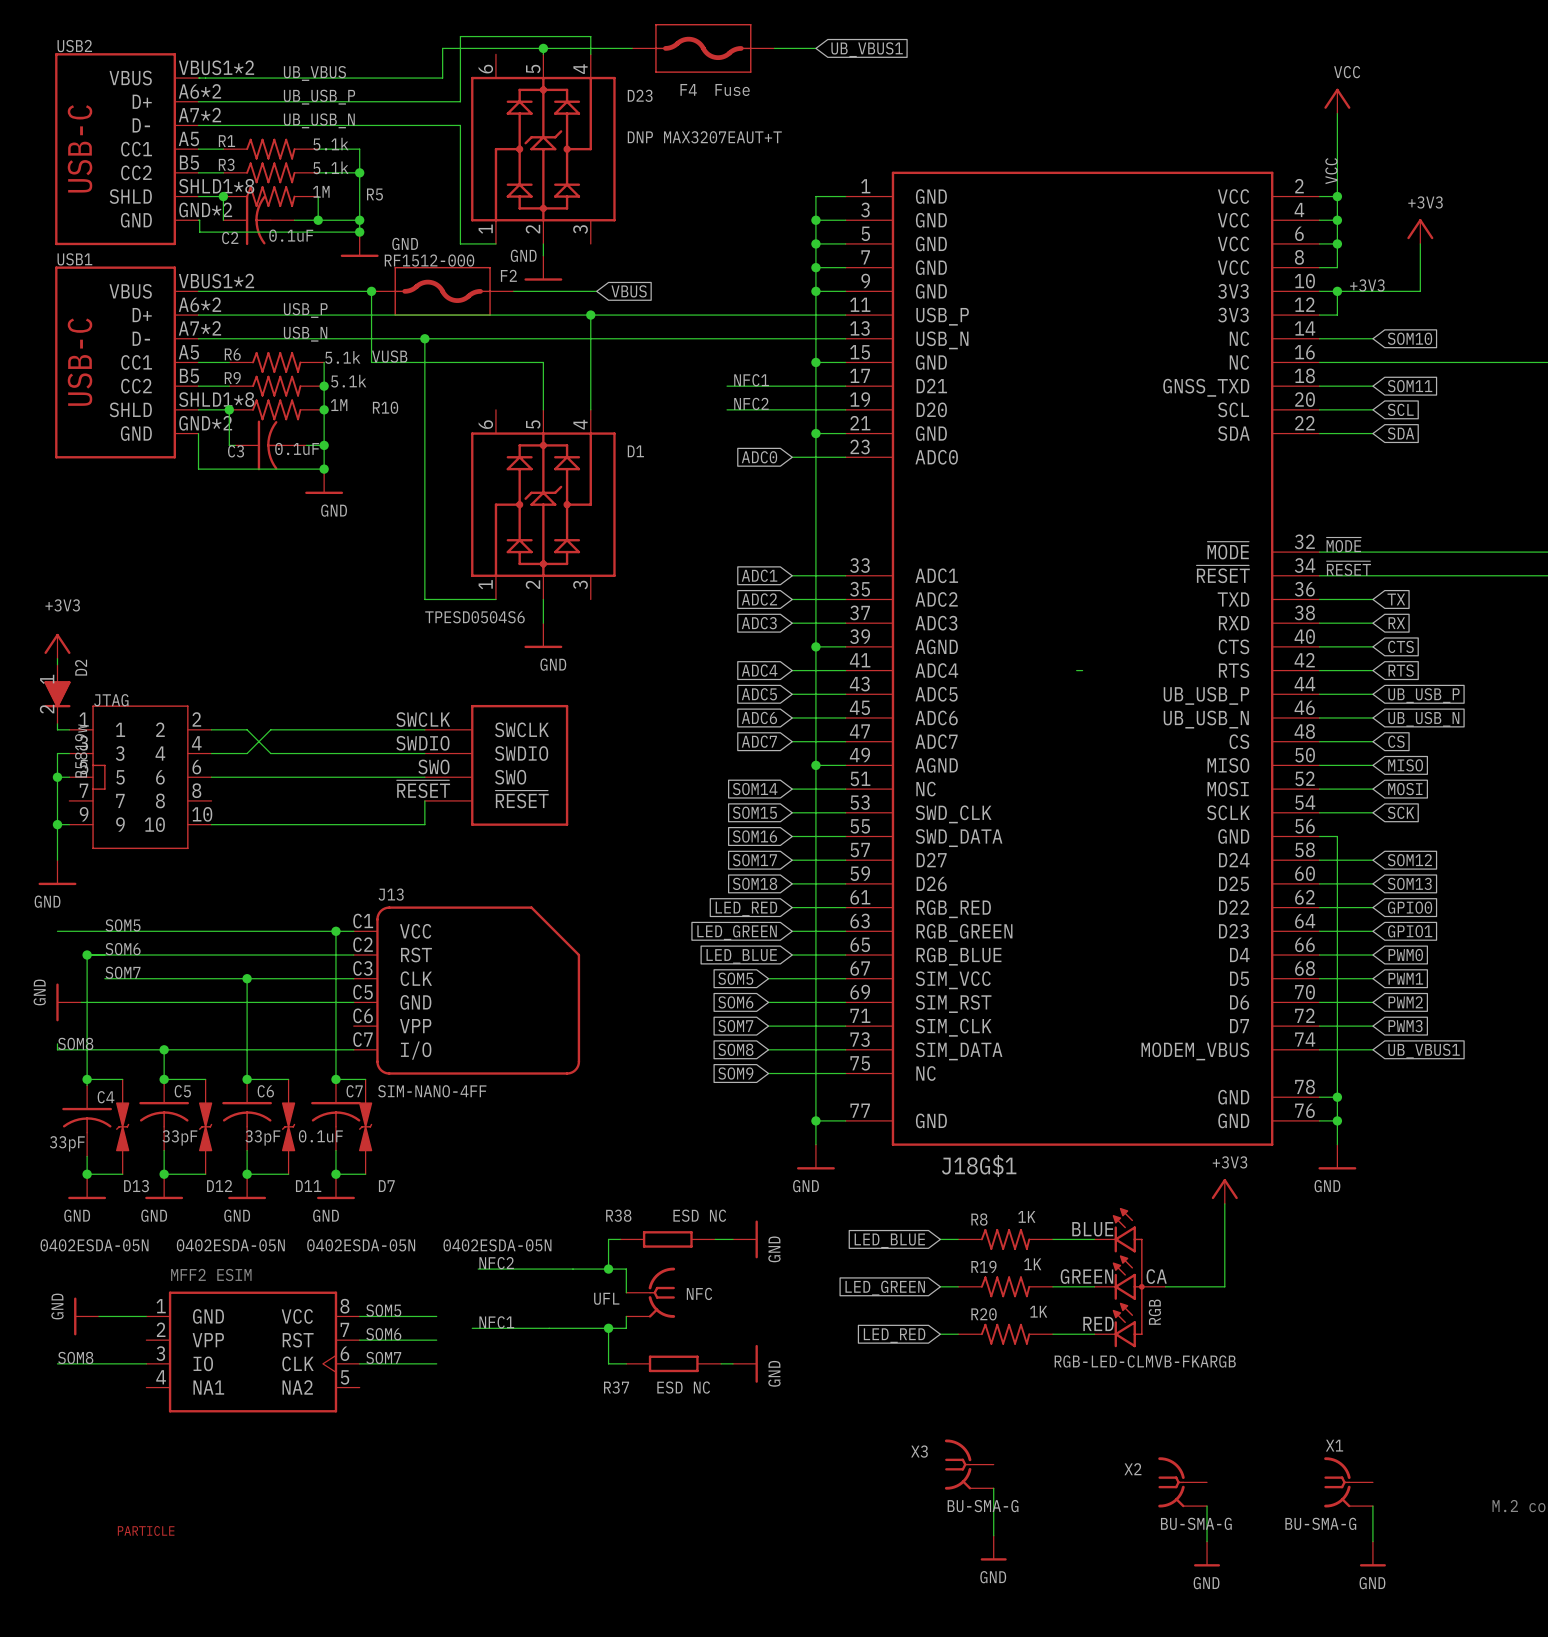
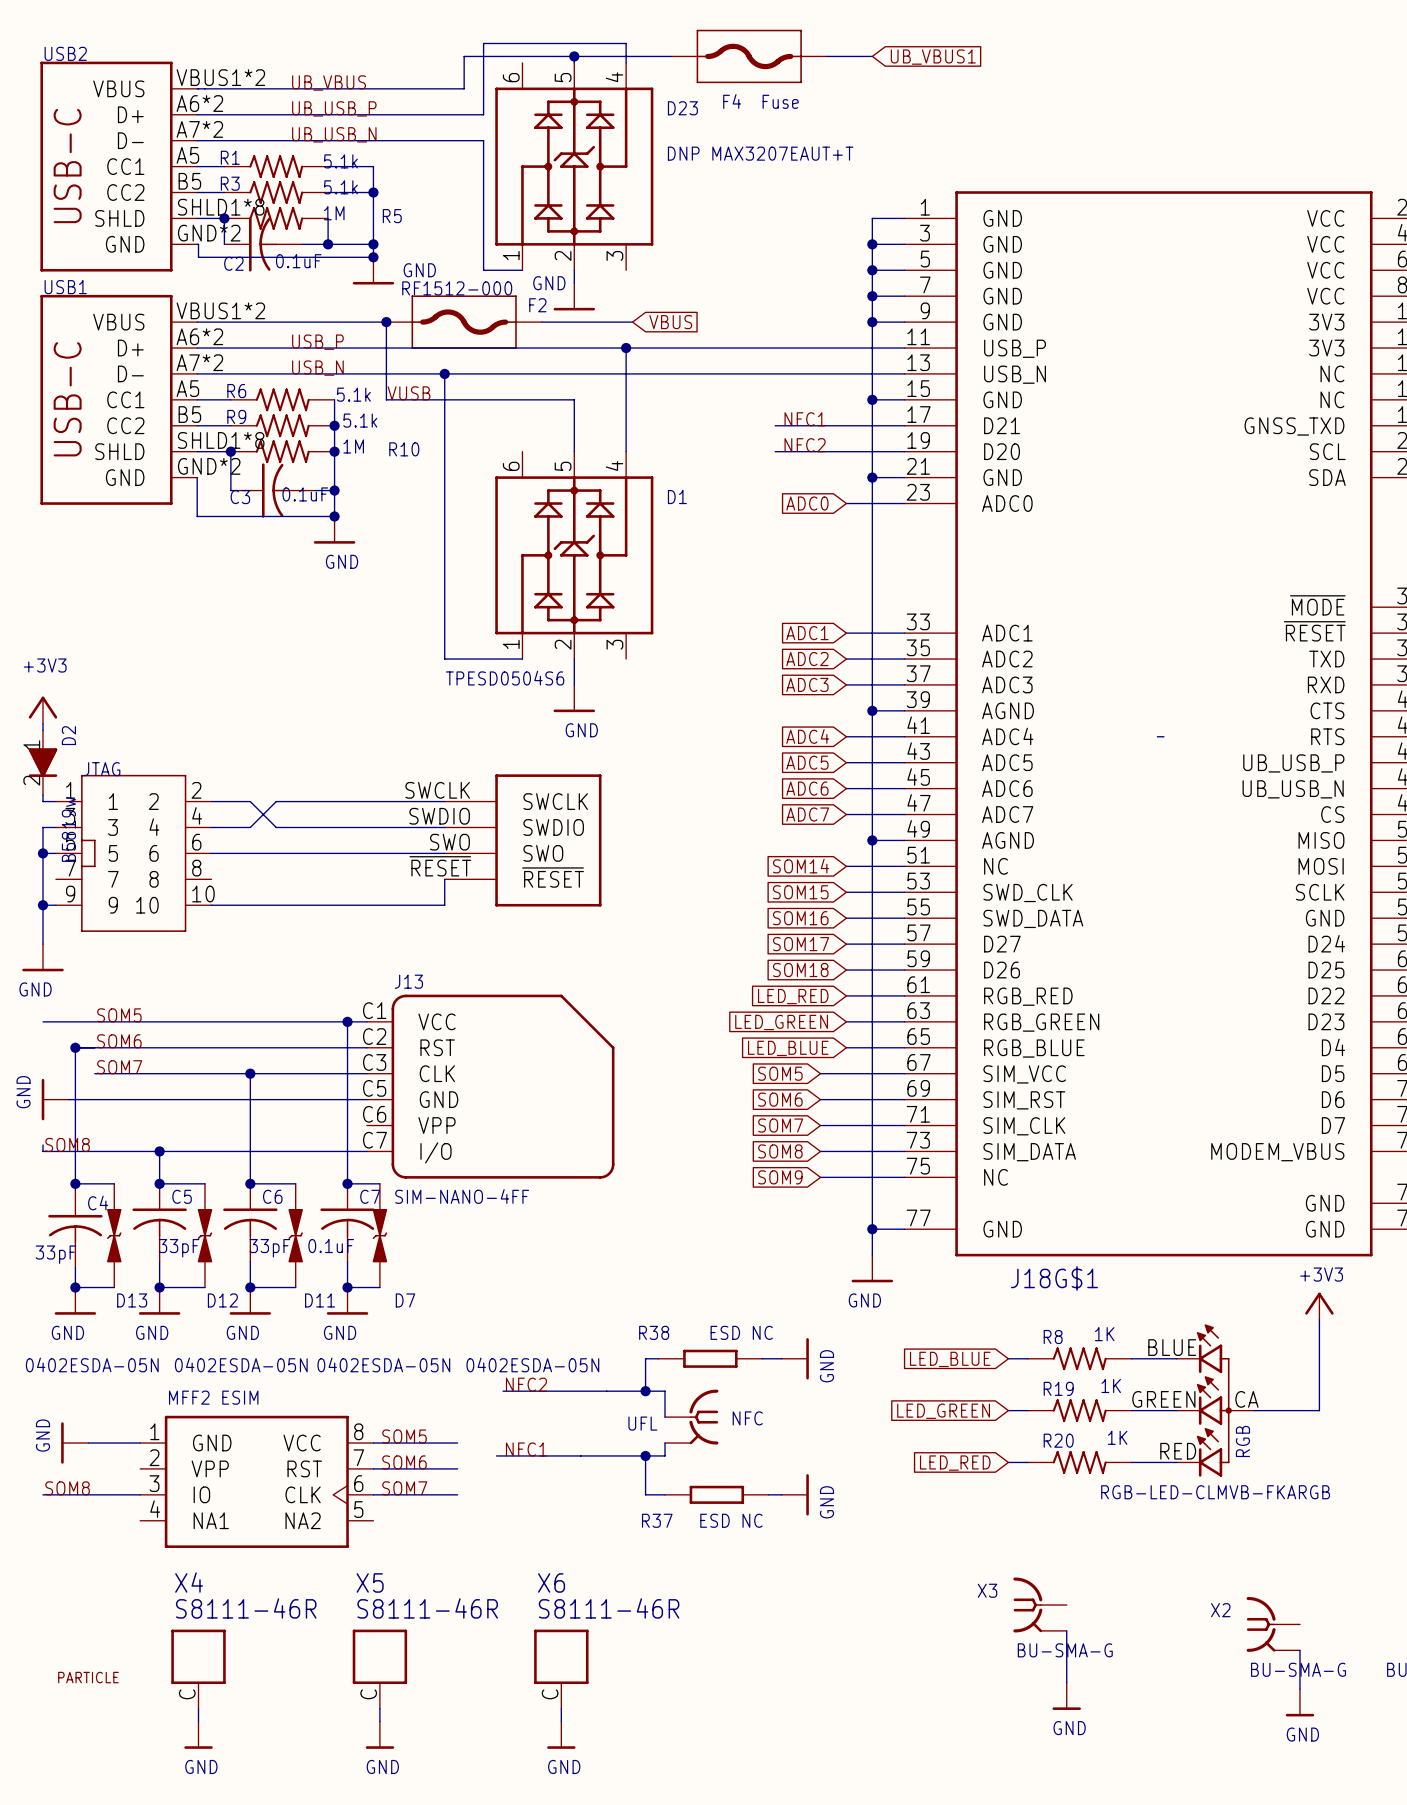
X4: none -> S8111-46R (198, 1669)
X5: none -> S8111-46R (379, 1669)
X6: none -> S8111-46R (561, 1669)
part position: (146, 1530) -> (88, 1677)
wire: none -> (198, 1708) (198, 1721)
wire: none -> (379, 1708) (379, 1721)
wire: none -> (561, 1708) (561, 1721)
power symbol: none -> GND (198, 1735)
power symbol: none -> GND (379, 1735)
power symbol: none -> GND (561, 1735)

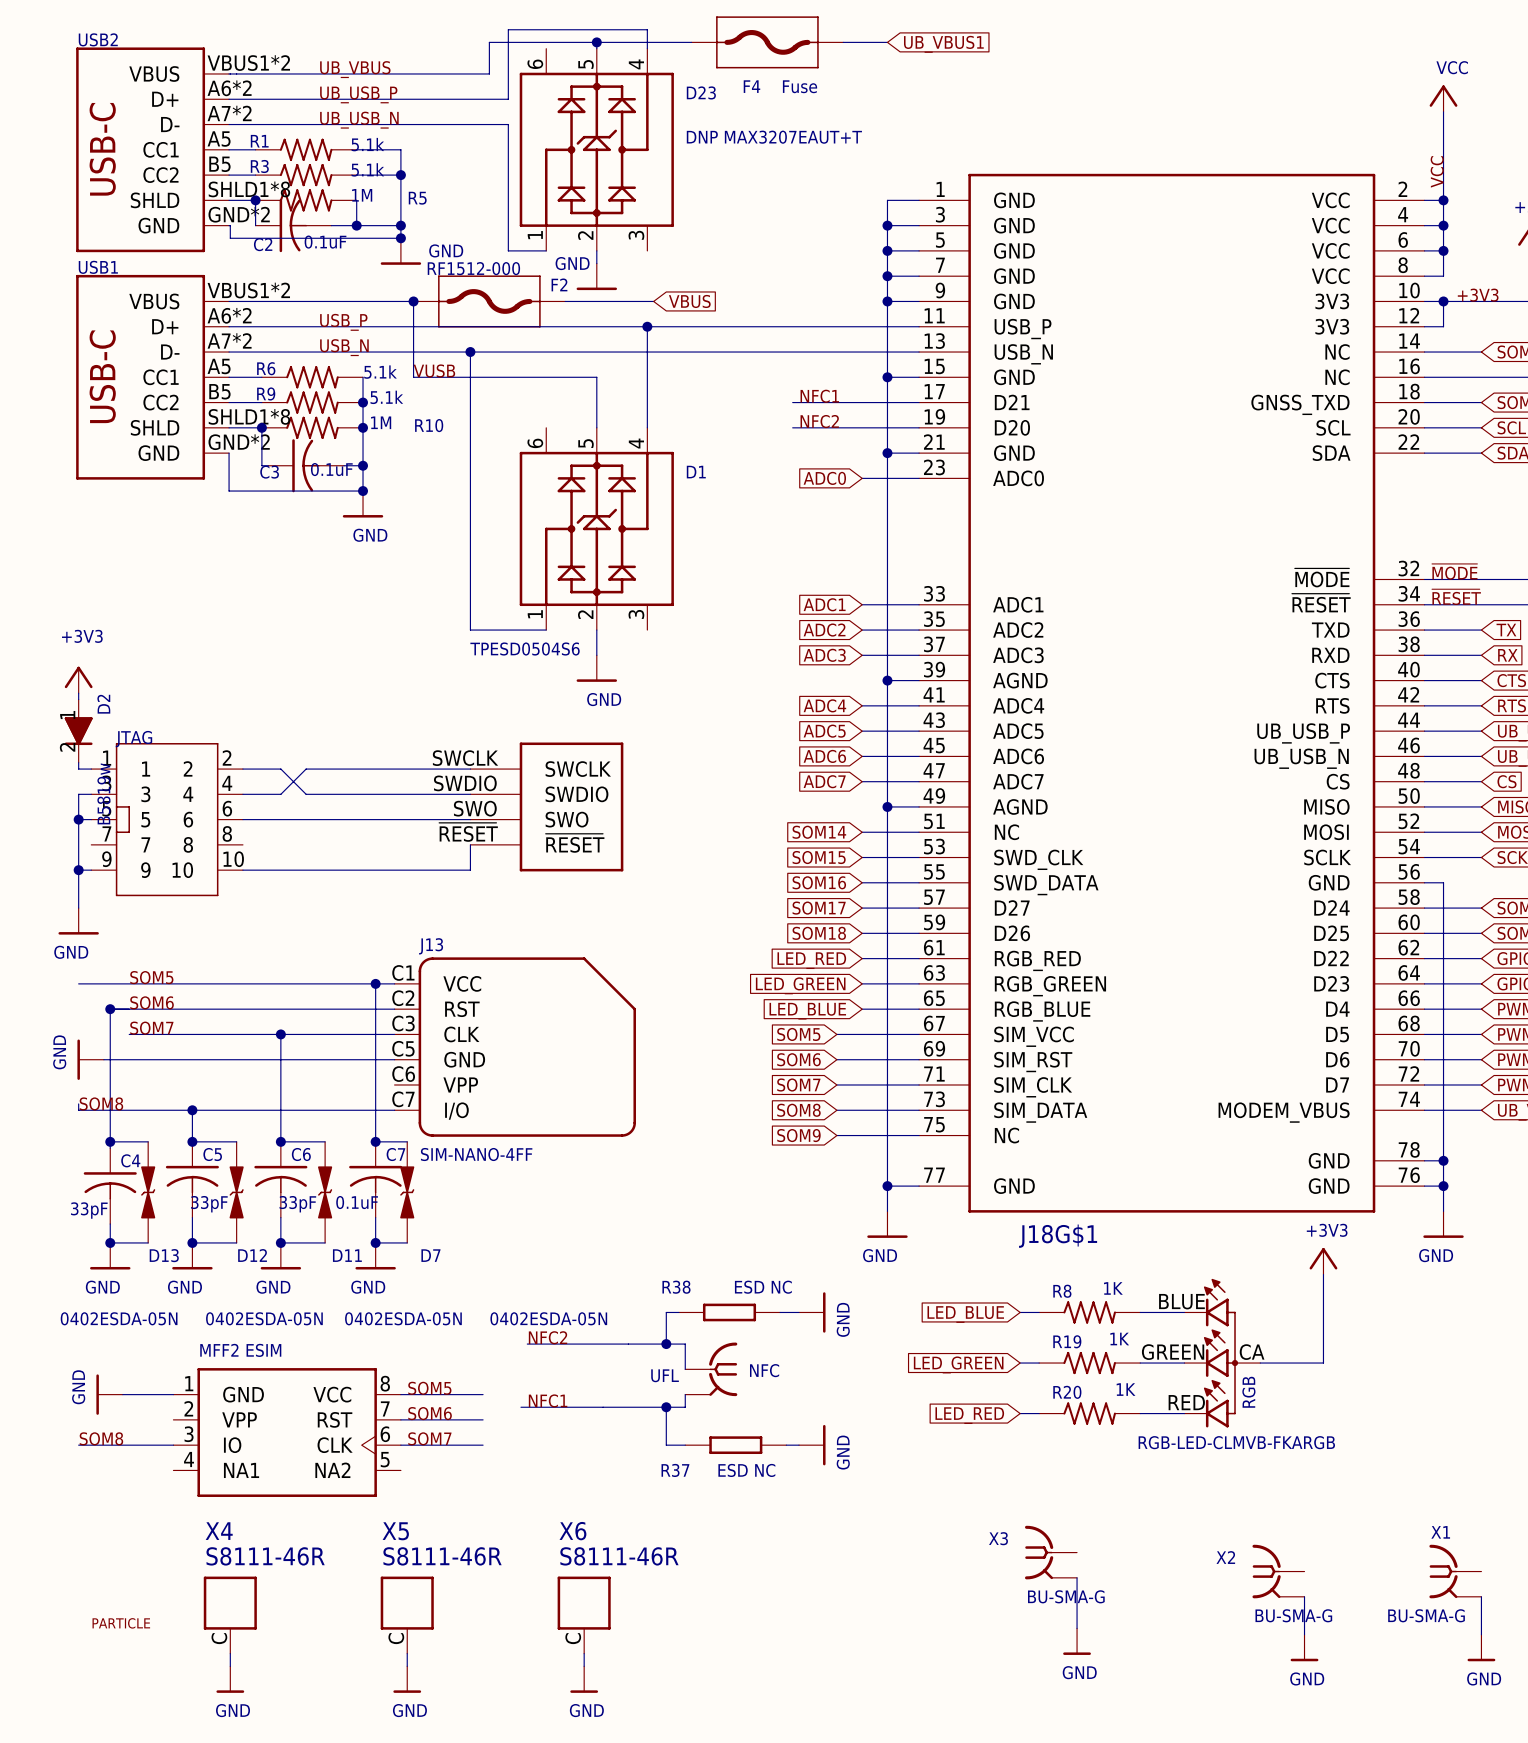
wire: (1157, 736) (1163, 736) -> none

